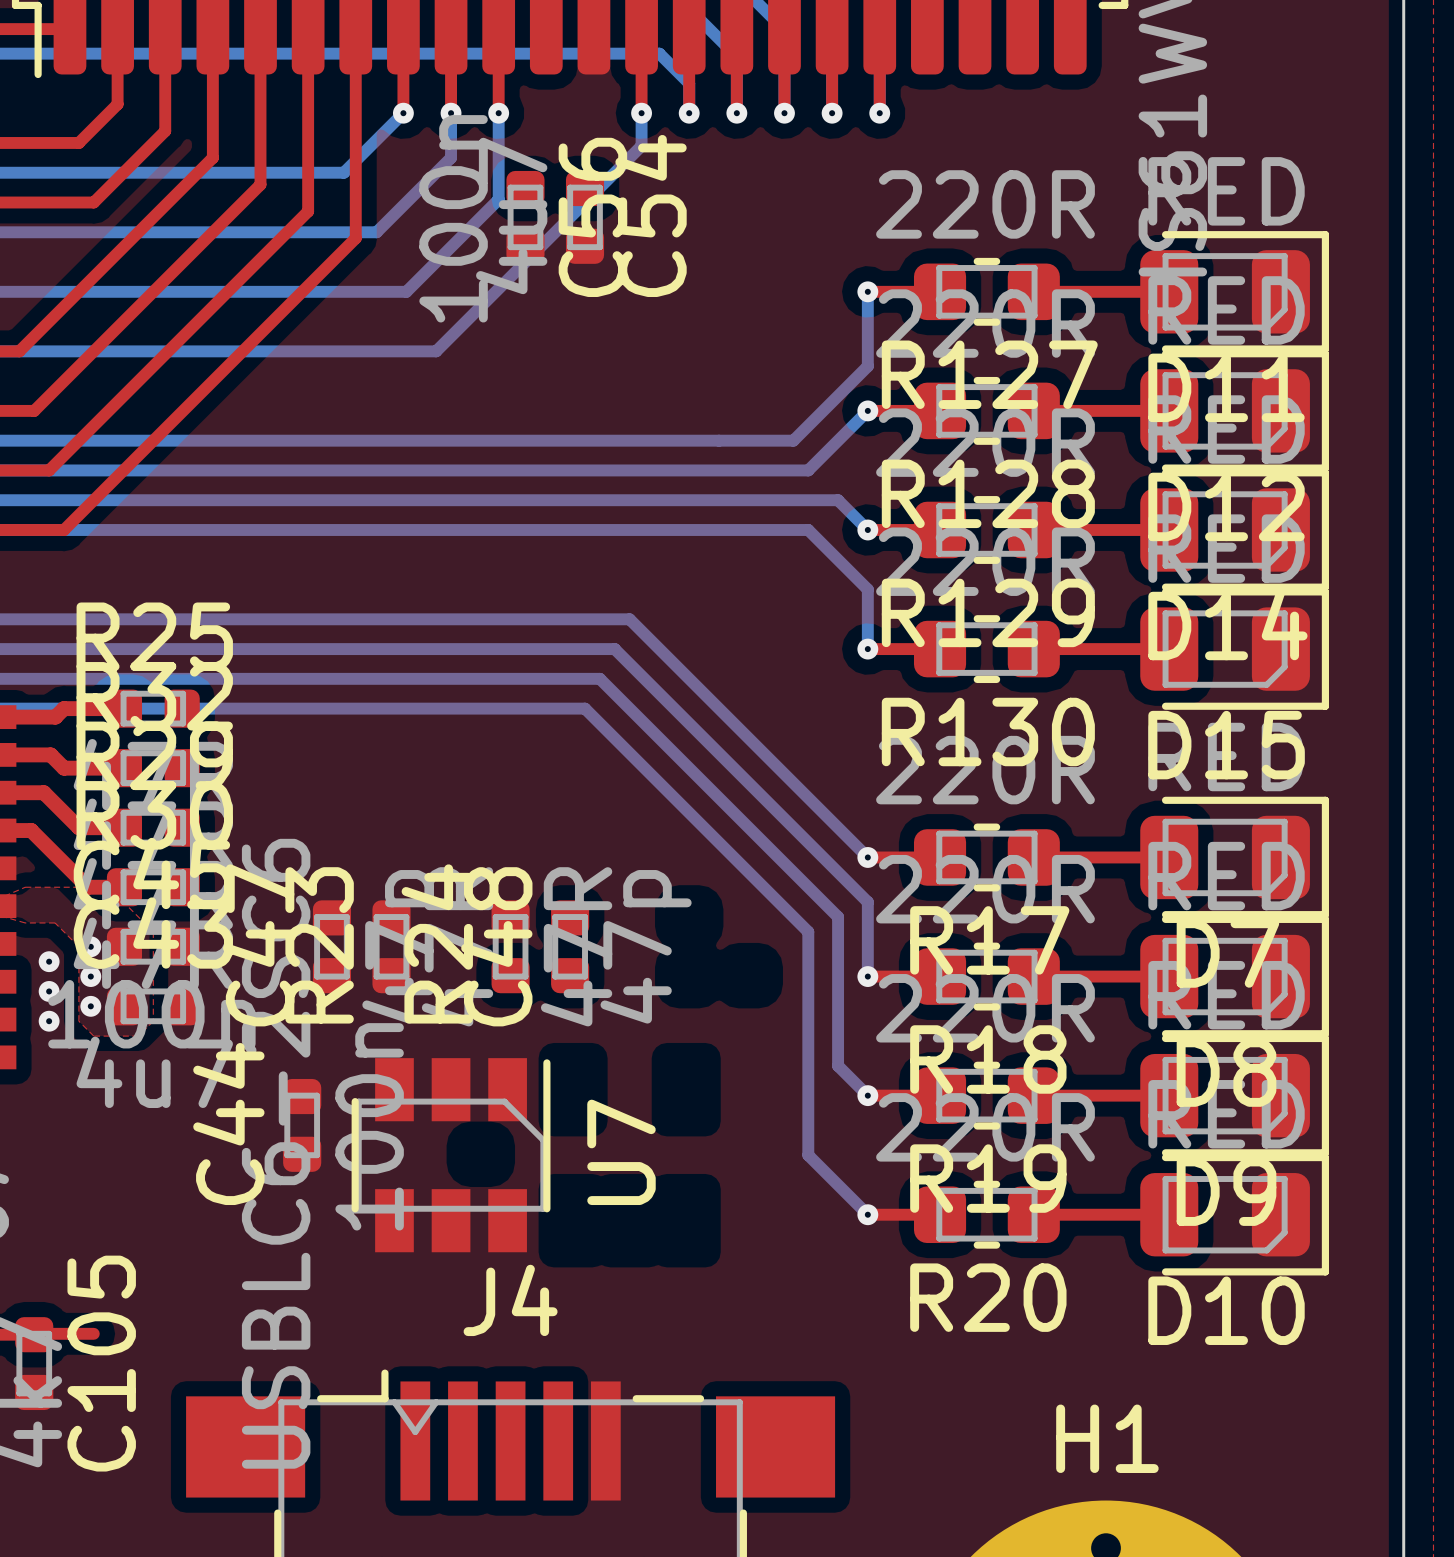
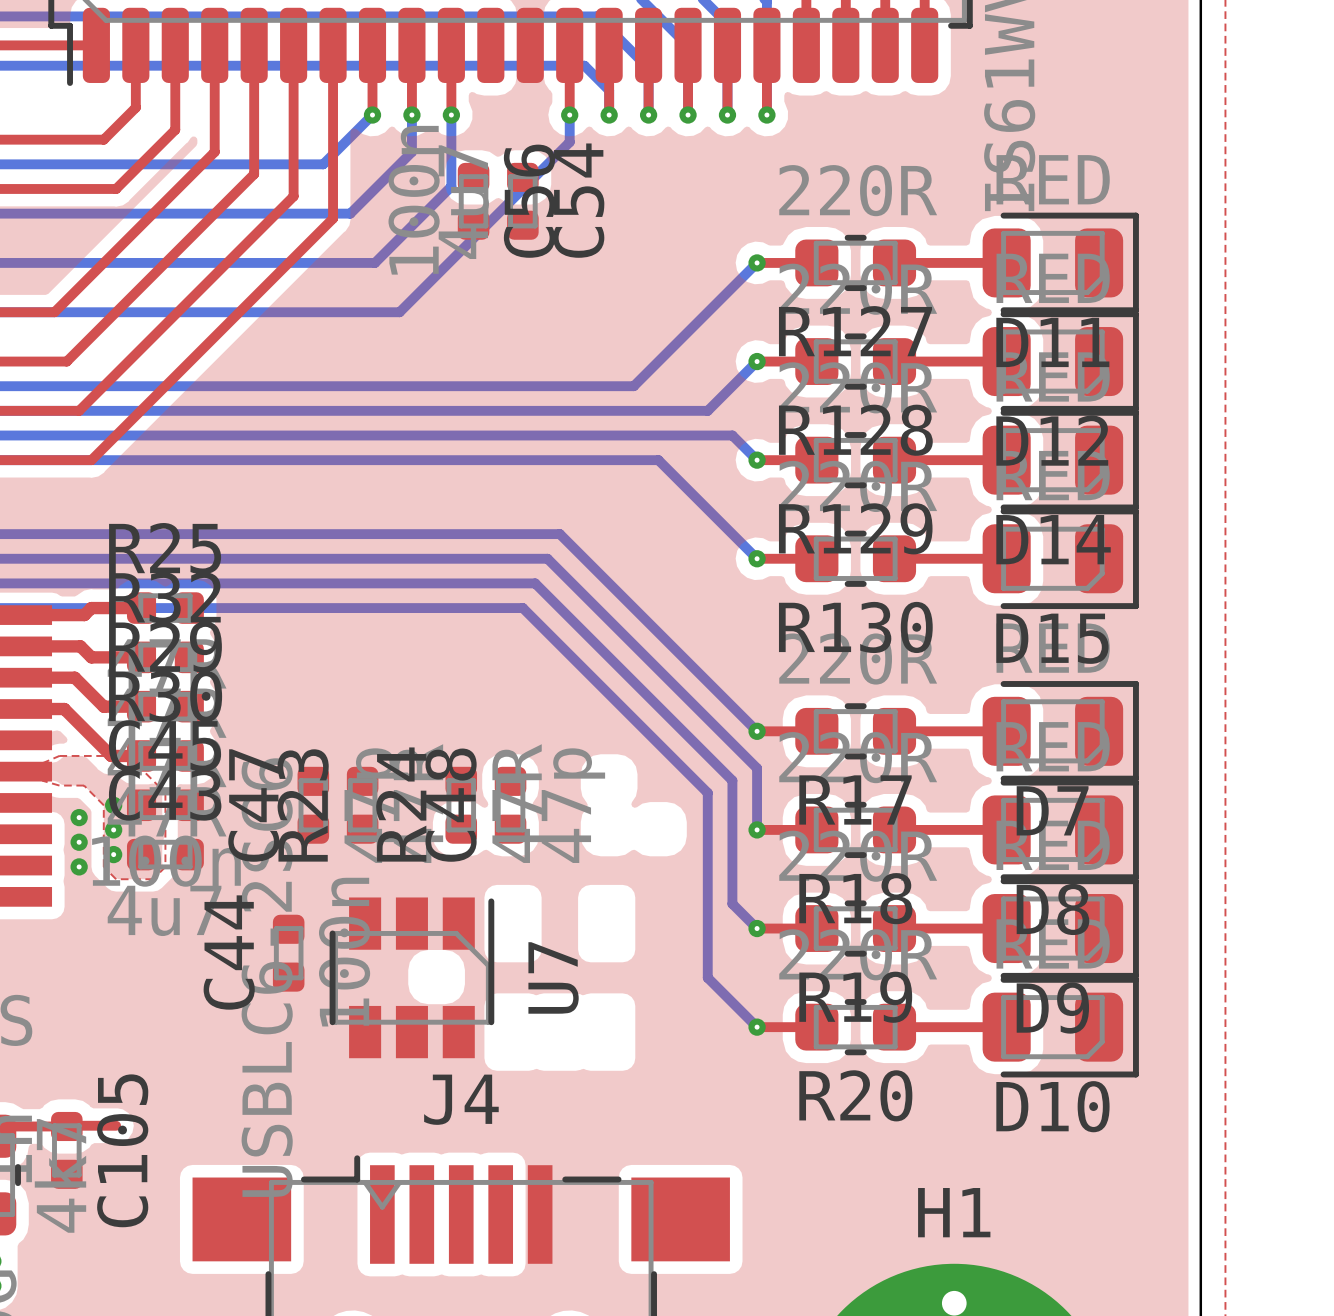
bottom track: (867, 291) (867, 366) (793, 440) (718, 440) -> (757, 262) (633, 386)
bottom track: (748, 529) (808, 529) (867, 589) (867, 649) -> (658, 460) (757, 558)

